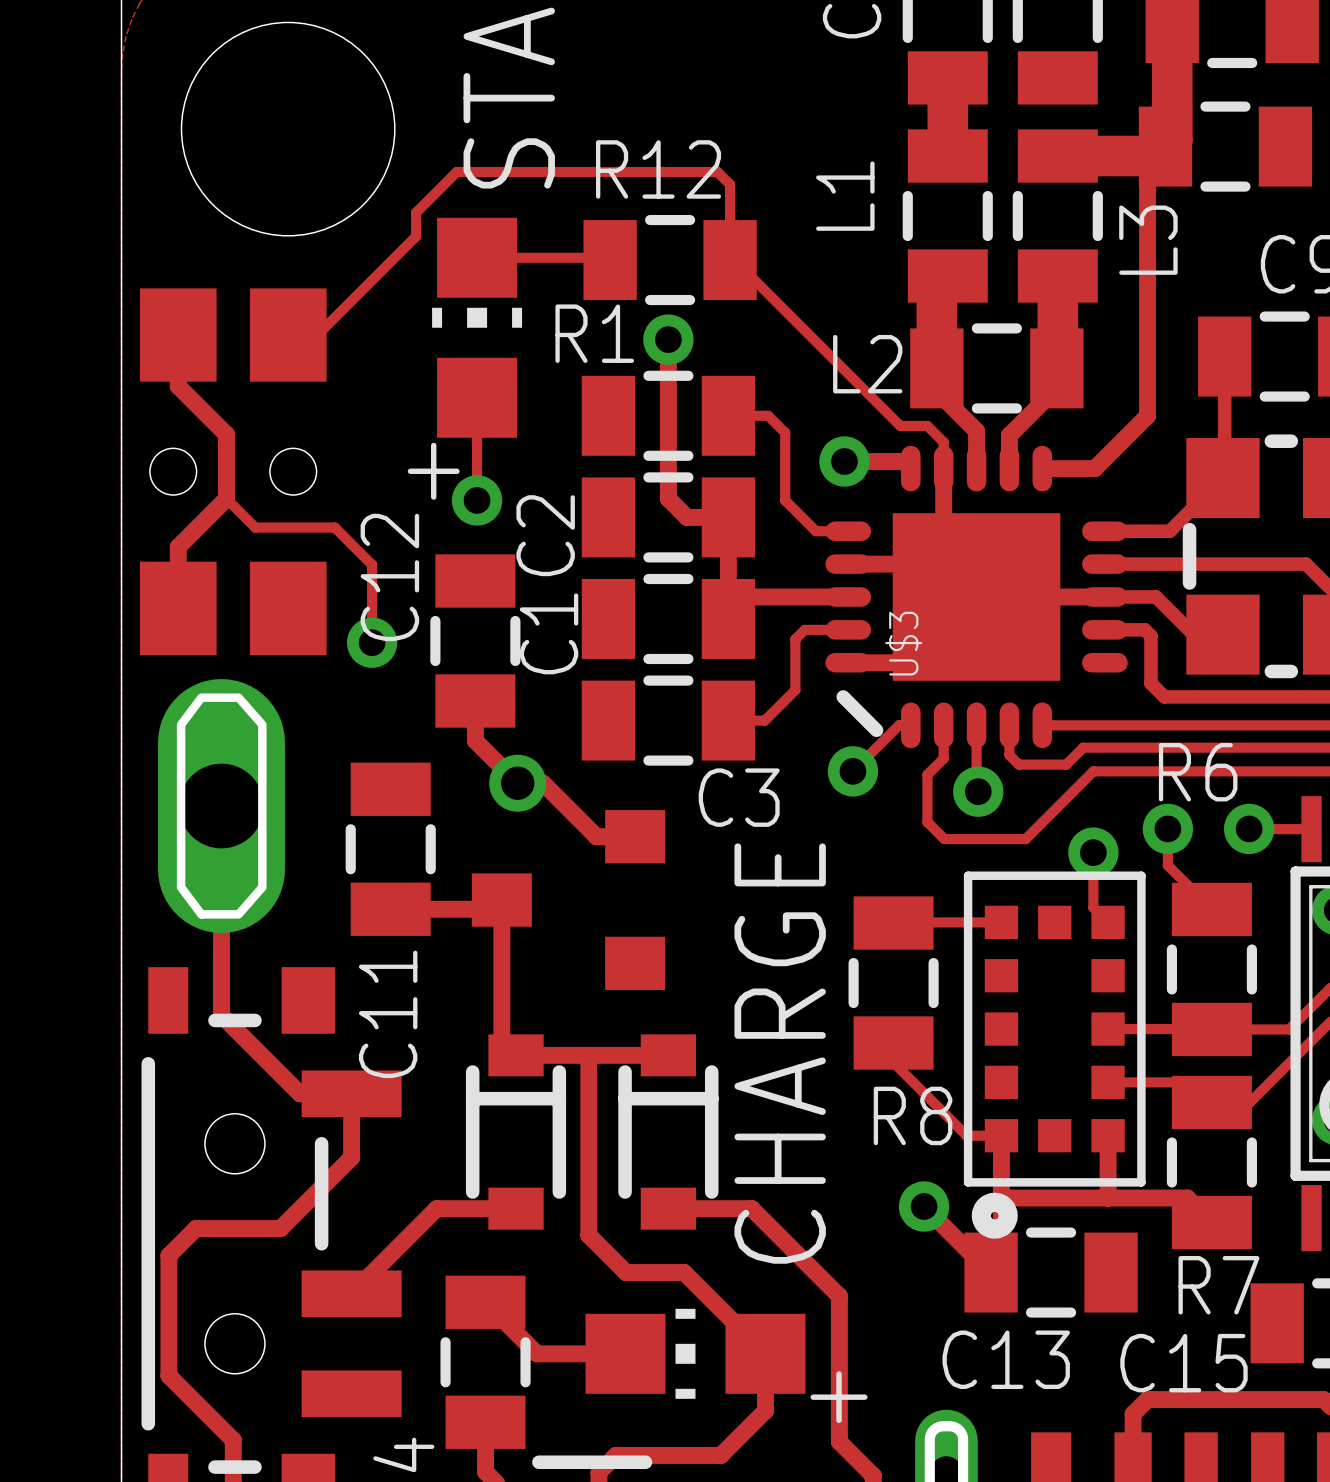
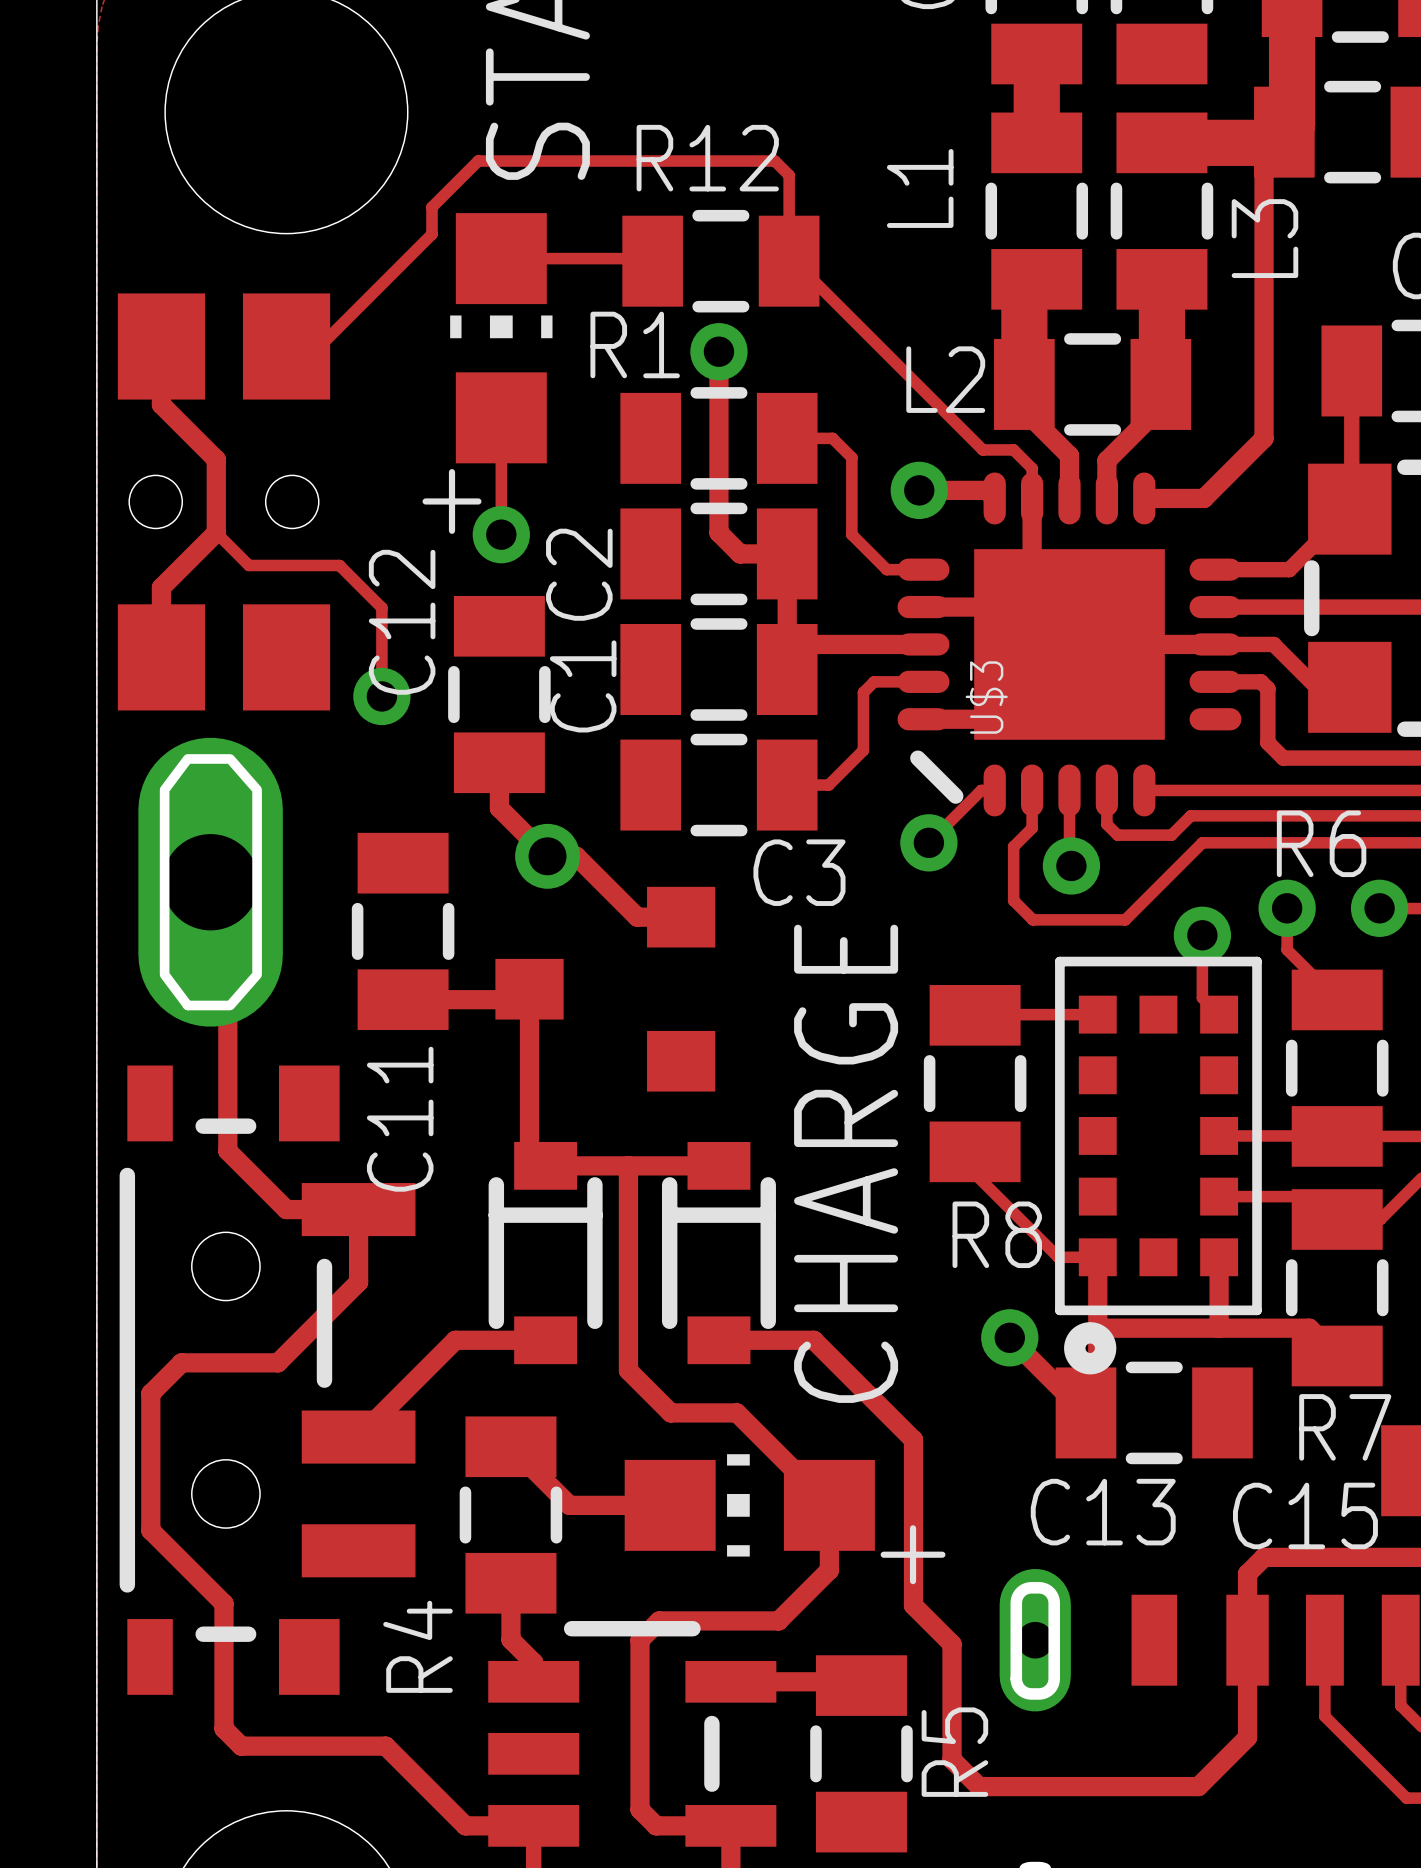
track: (221, 806) (221, 1015) (300, 1093) -> (210, 882) (227, 899) (227, 1150) (286, 1209) (299, 1209)

